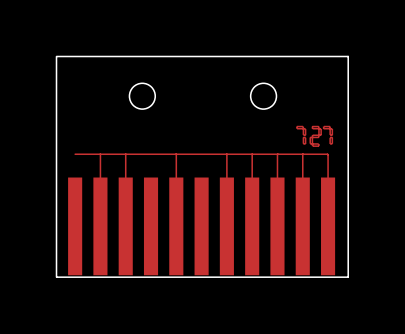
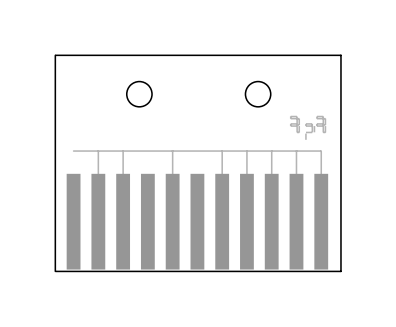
zone outline: none -> (297, 118) (297, 116) (290, 116) (290, 118) (299, 118) (299, 125) (297, 125) (297, 118)
zone outline: none -> (323, 118) (323, 116) (316, 116) (316, 118) (325, 118) (325, 125) (323, 125) (323, 118)
zone outline: (318, 135) (318, 137) (310, 137) (310, 143) (318, 143) (318, 146) (312, 146) (312, 143) -> none
zone outline: (303, 137) (303, 143) (305, 143) (305, 137) (303, 137) -> none
zone outline: (330, 137) (332, 137) (332, 143) (330, 143) (330, 137) -> none

